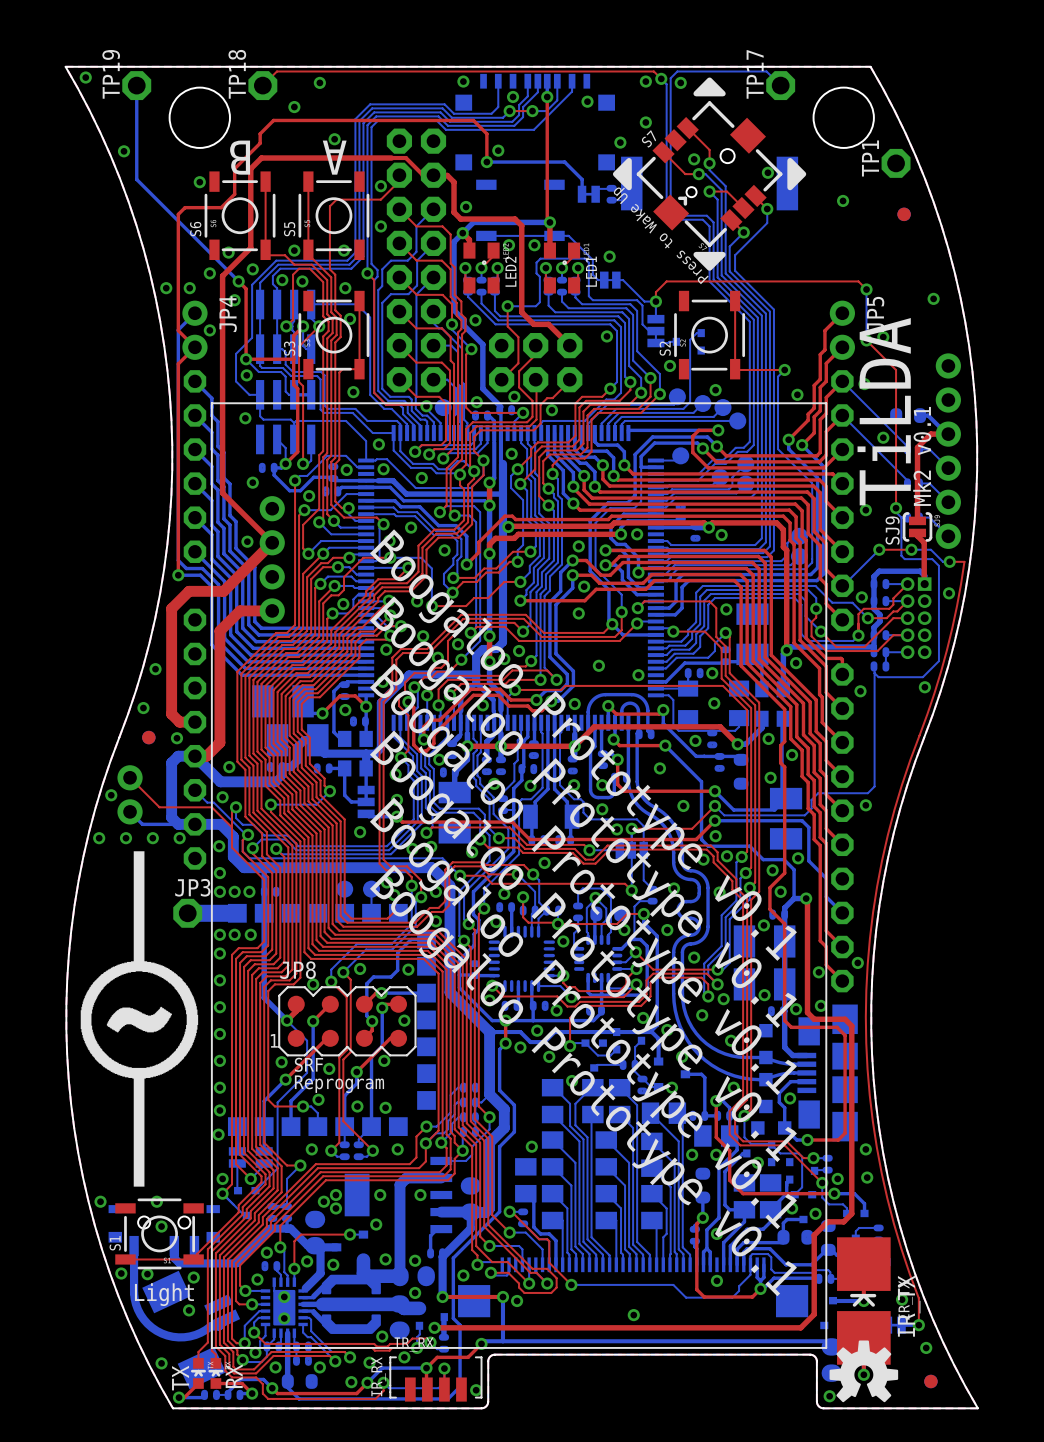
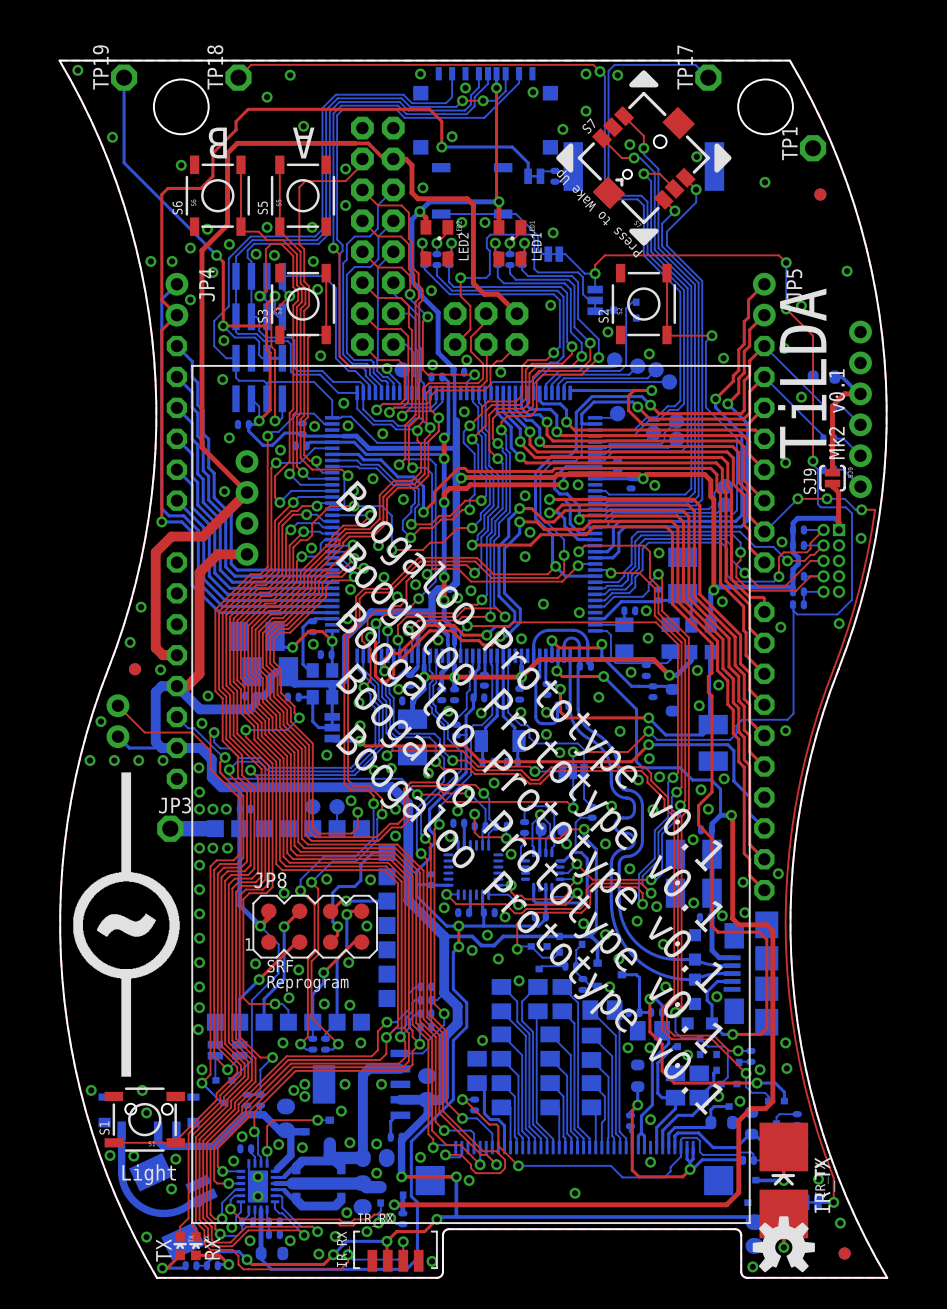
text: Boogaloo Prototype v0.1 (583, 1080) -> none

